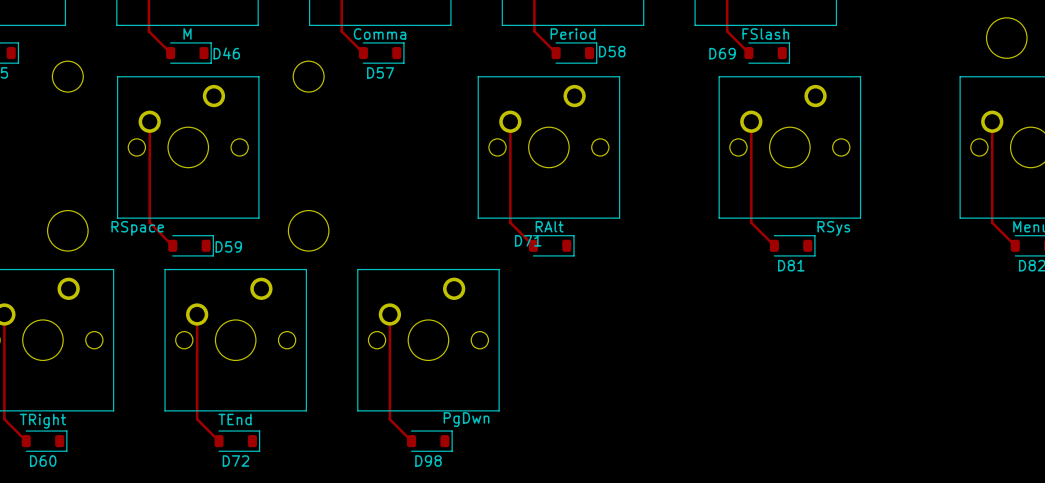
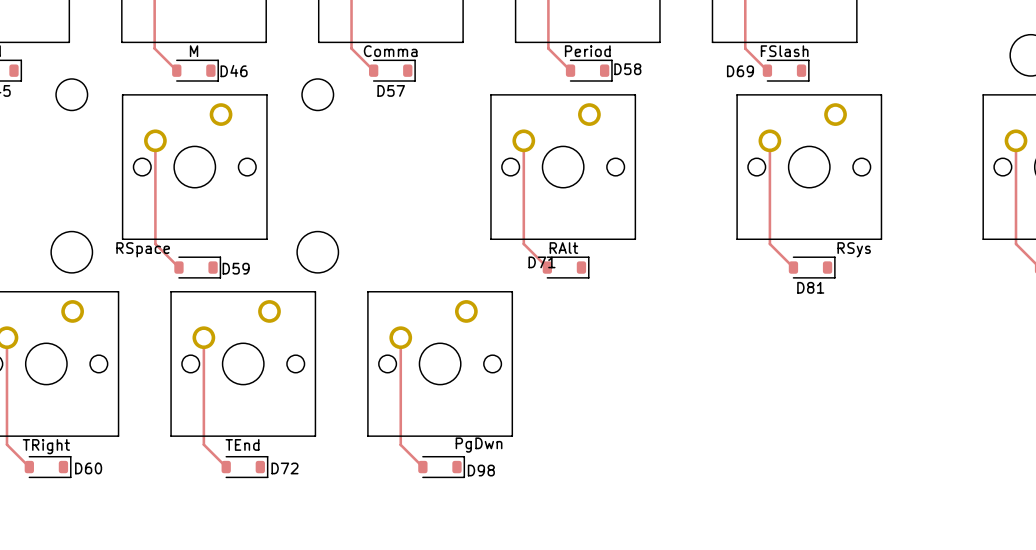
D60 name position: D60 (43, 461) -> D60 (88, 468)
D72 name position: D72 (235, 461) -> D72 (284, 468)
D98 name position: D98 (428, 461) -> D98 (481, 470)

